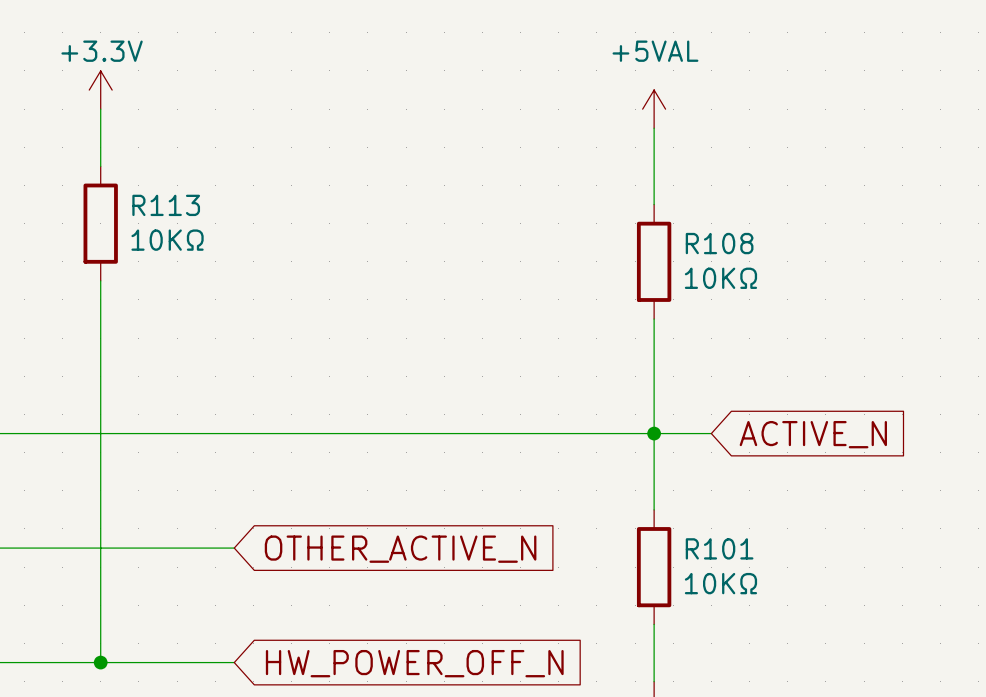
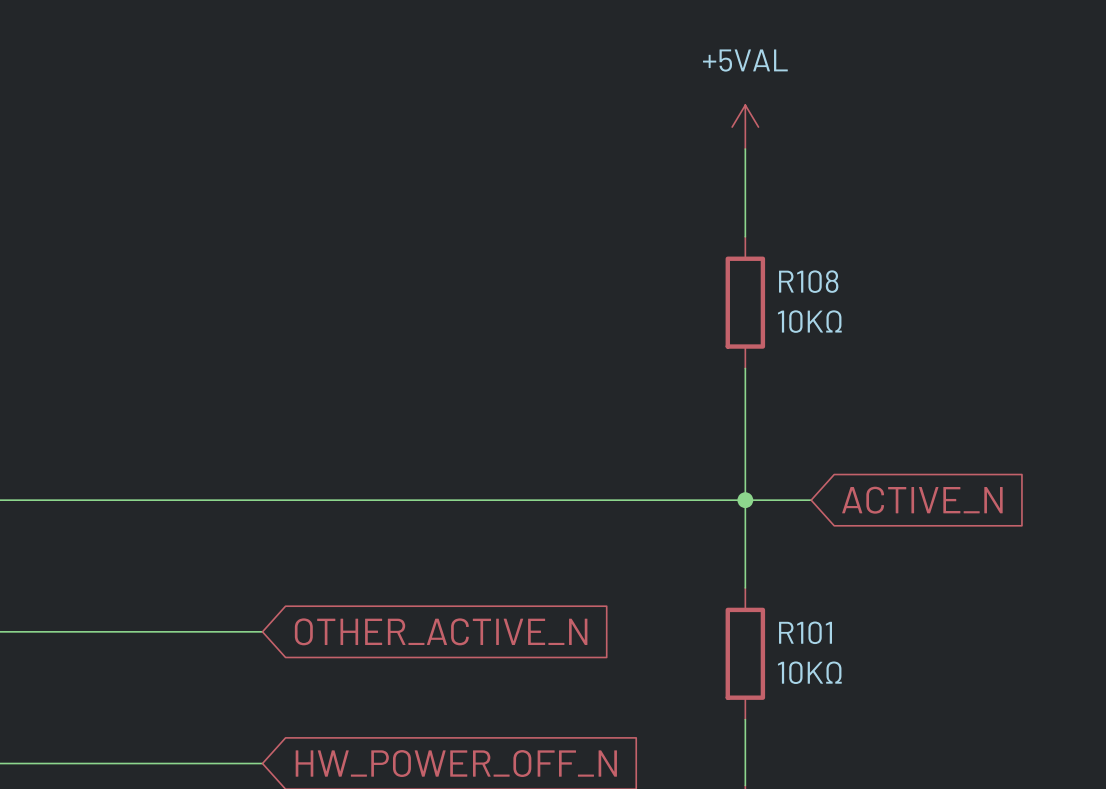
power symbol: +3.3V (100, 90) -> none
wire: (100, 109) (100, 166) -> none
R113: 10KΩ (100, 223) -> none
wire: (100, 280) (100, 662) -> none
junction: (100, 662) -> none

